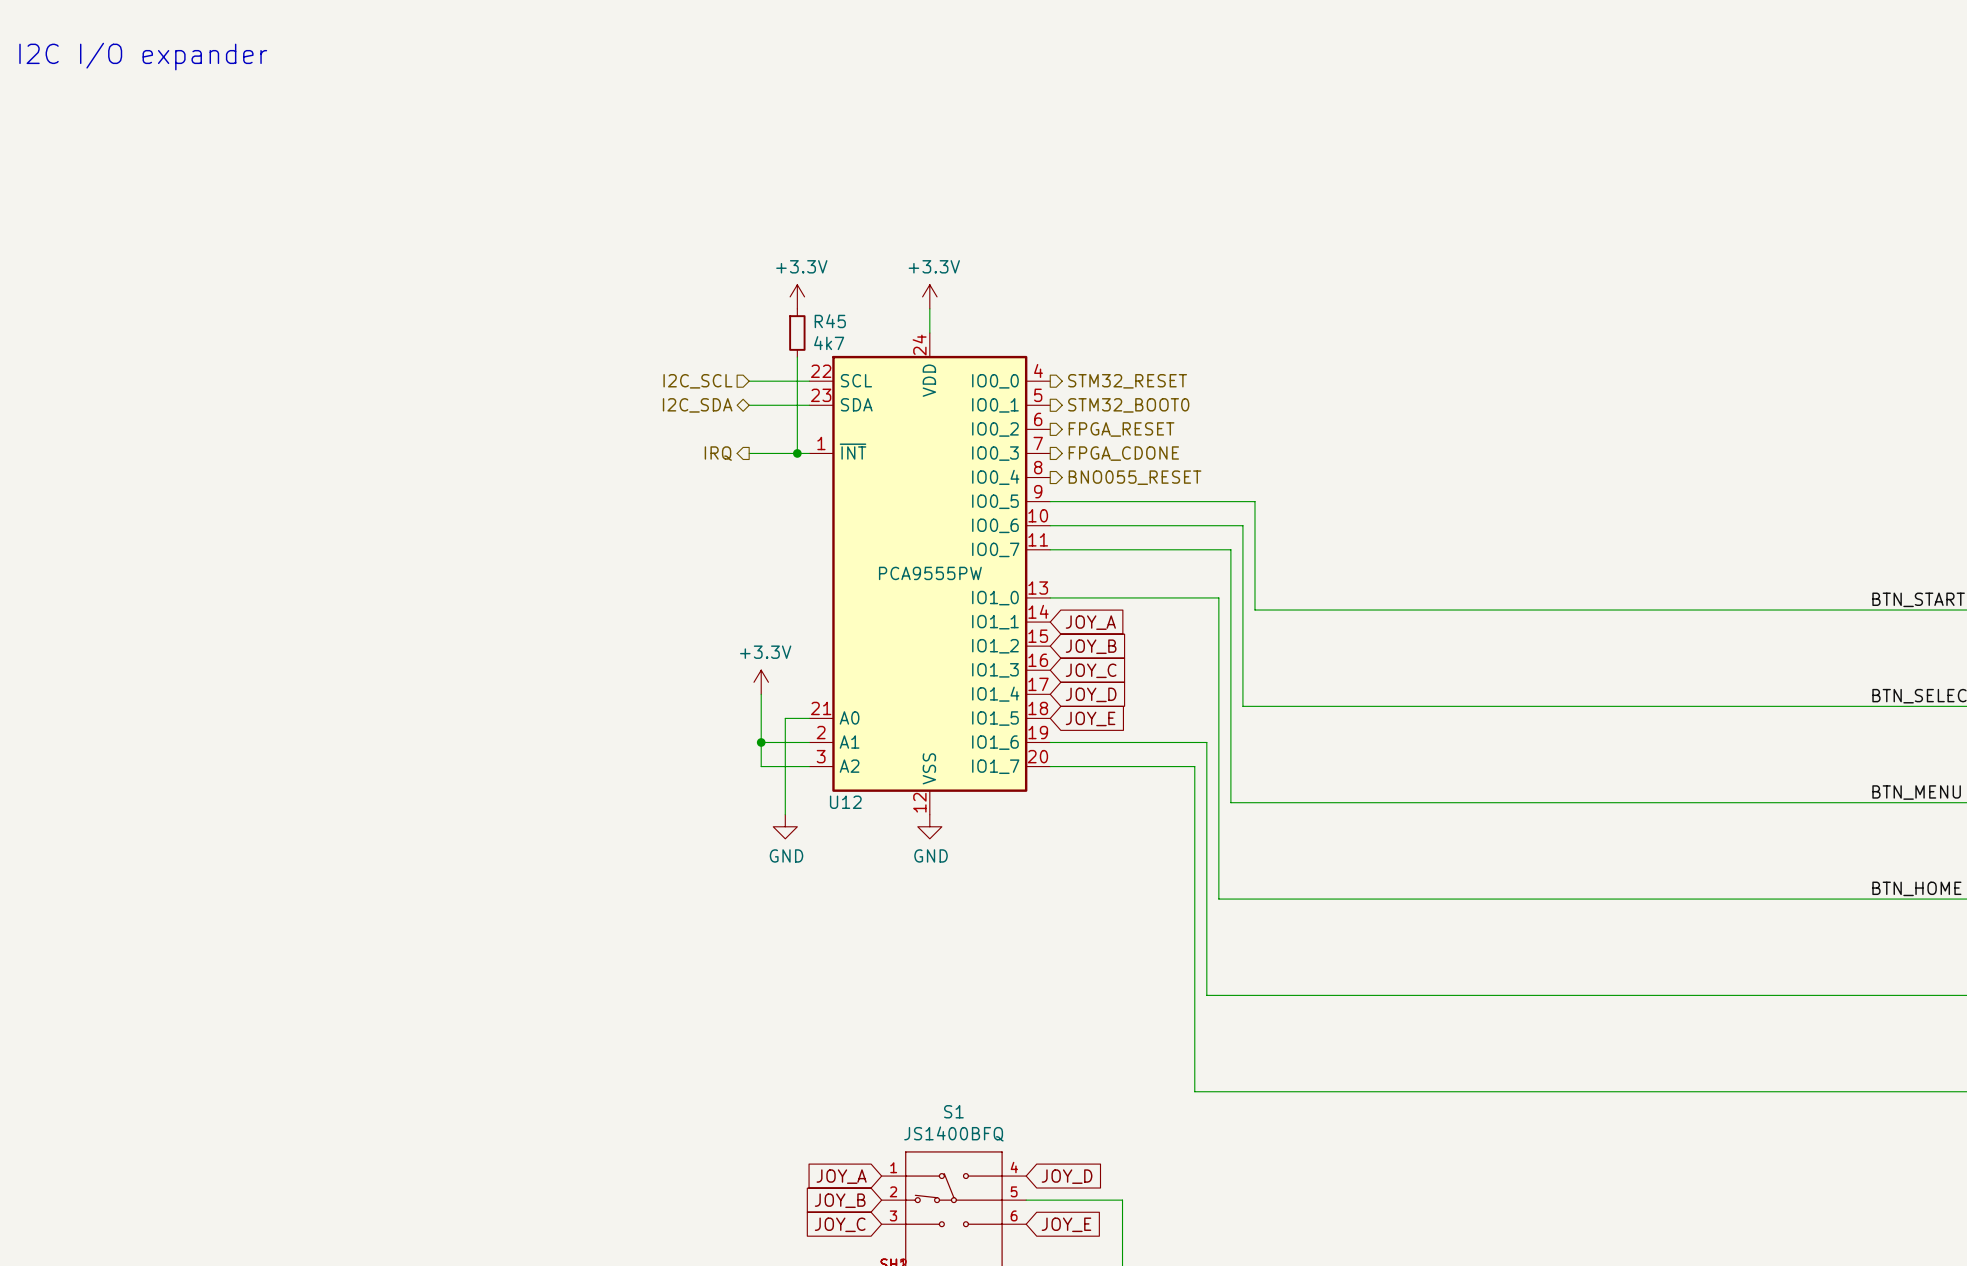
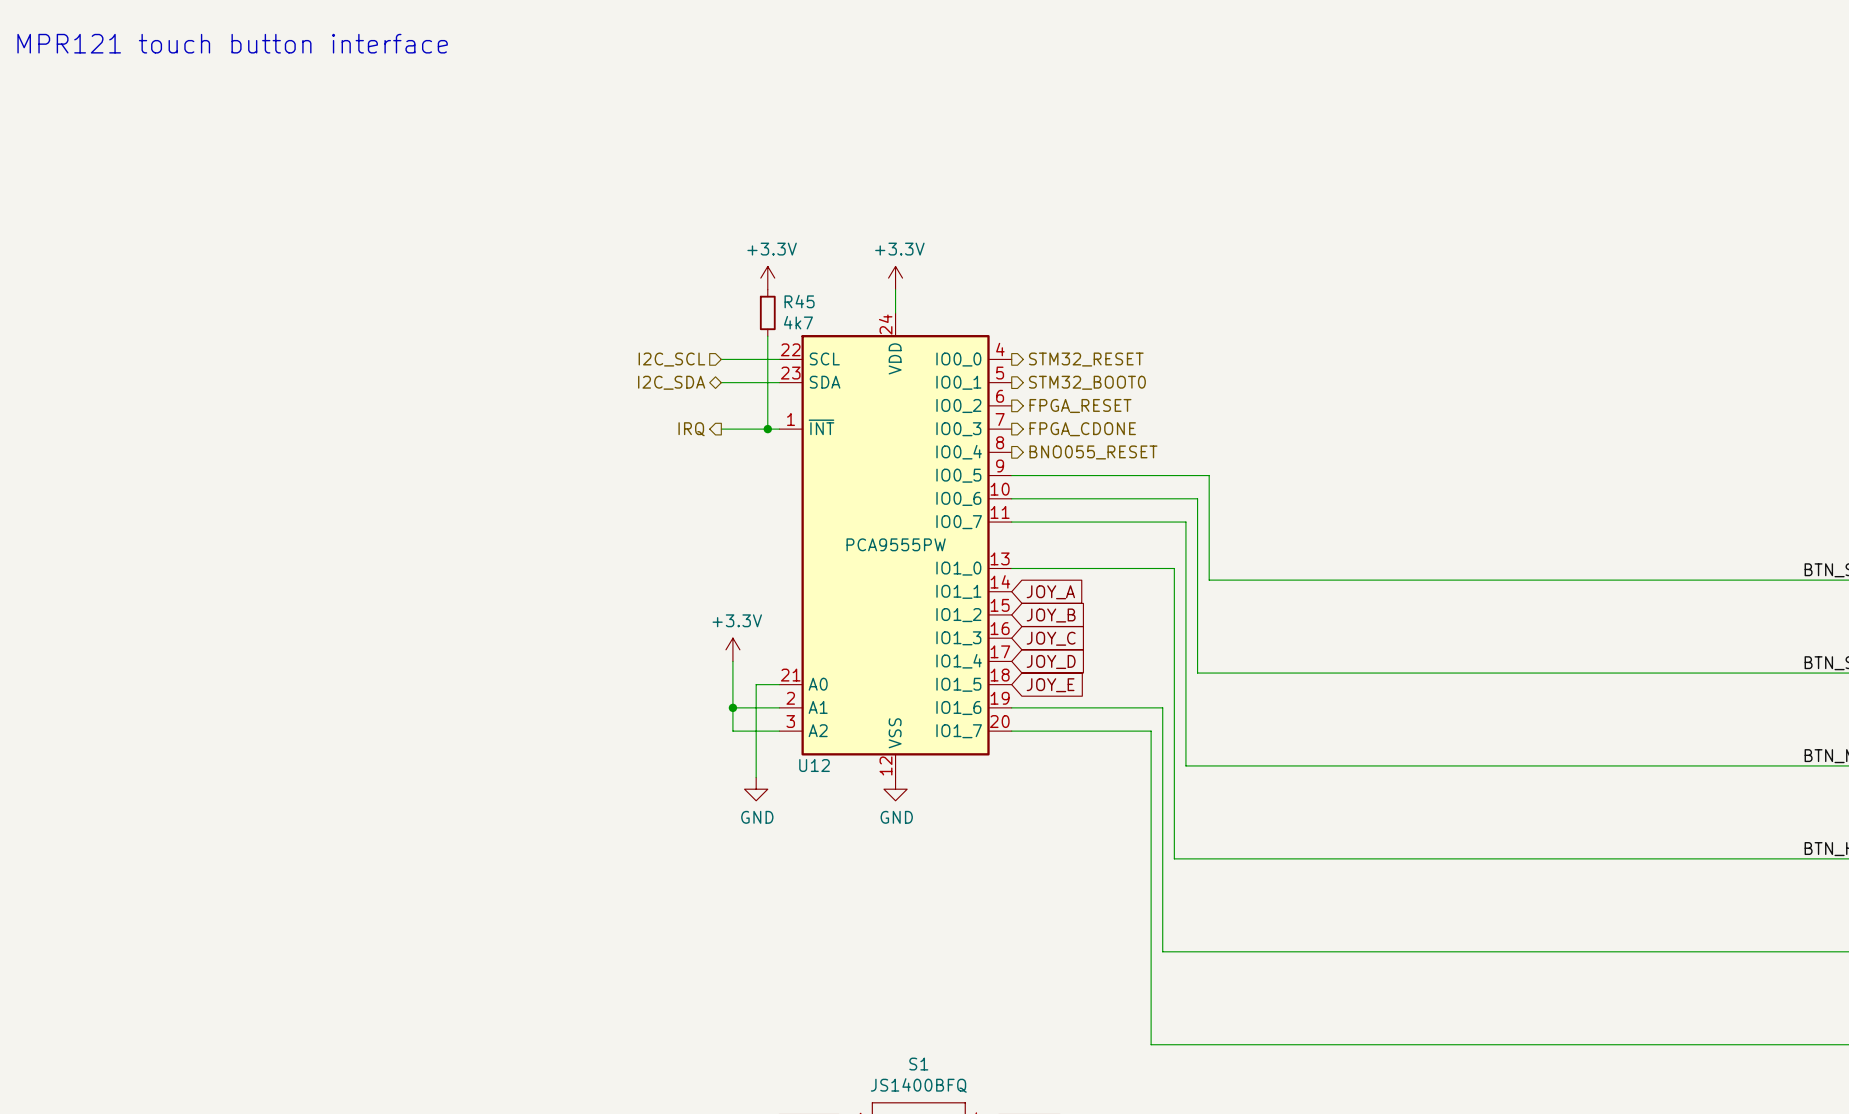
text: I2C I/O expander (143, 56) -> MPR121 touch button interface (232, 43)

